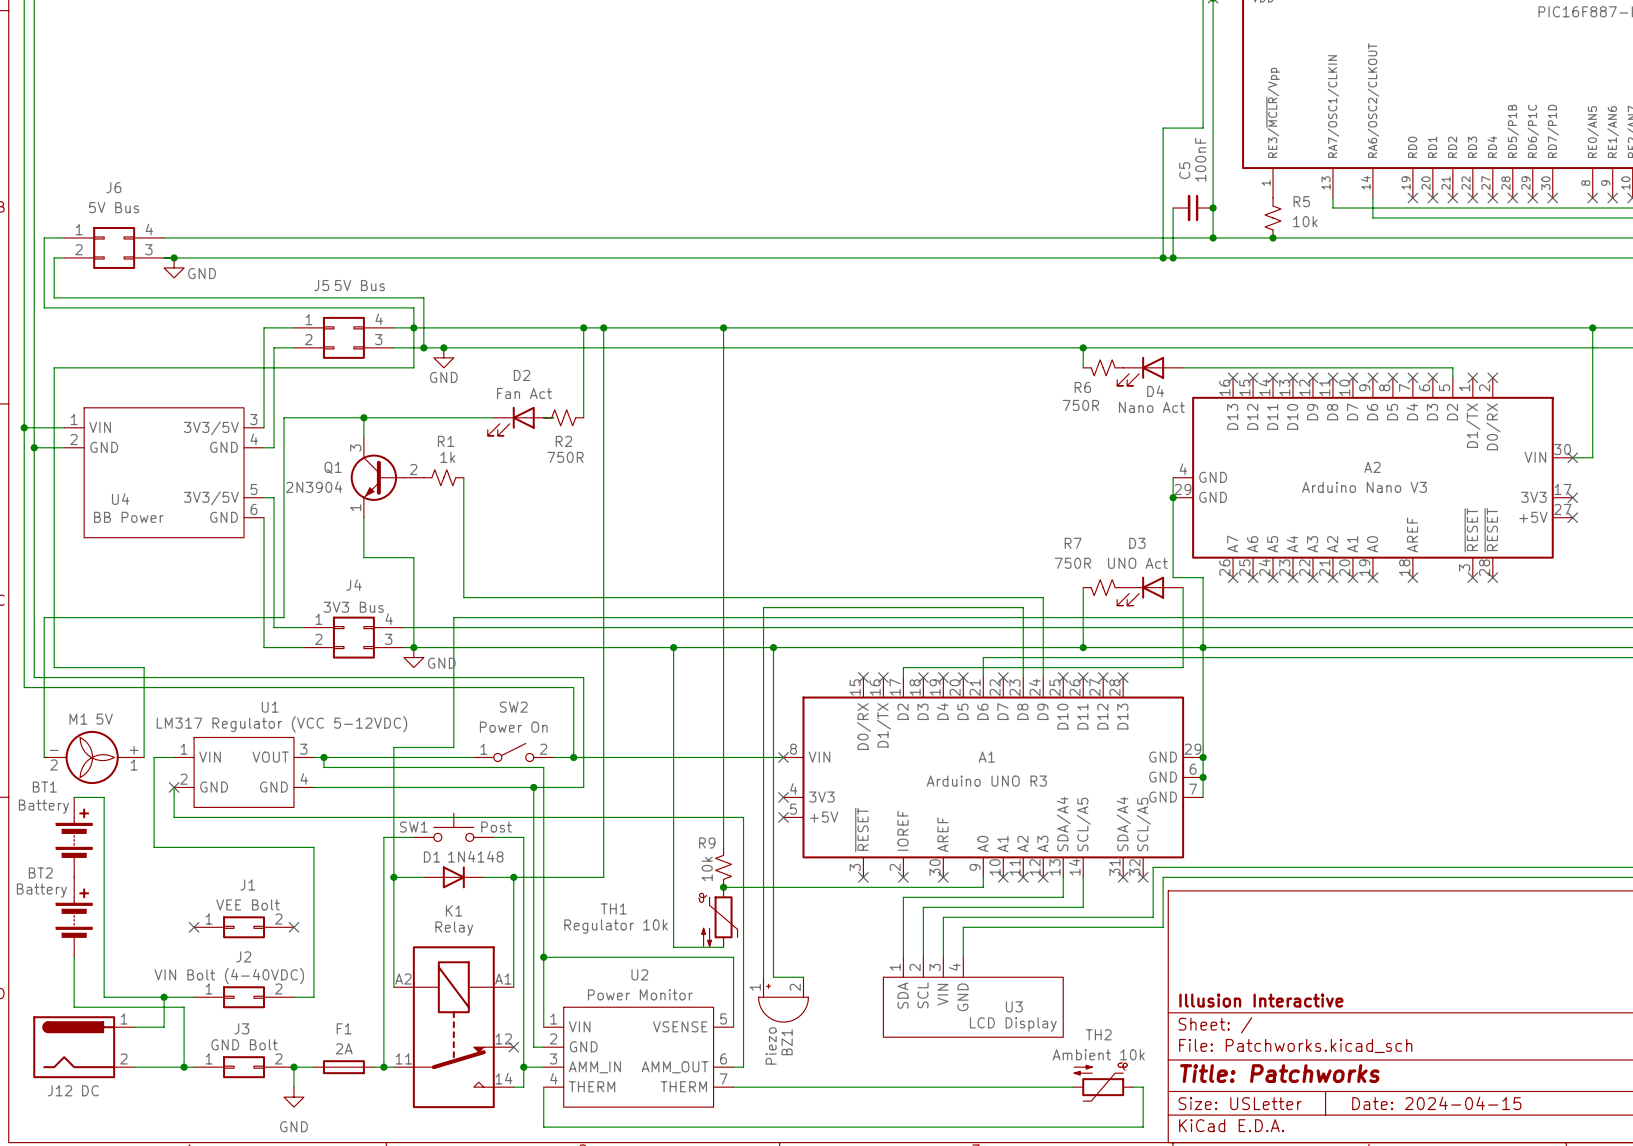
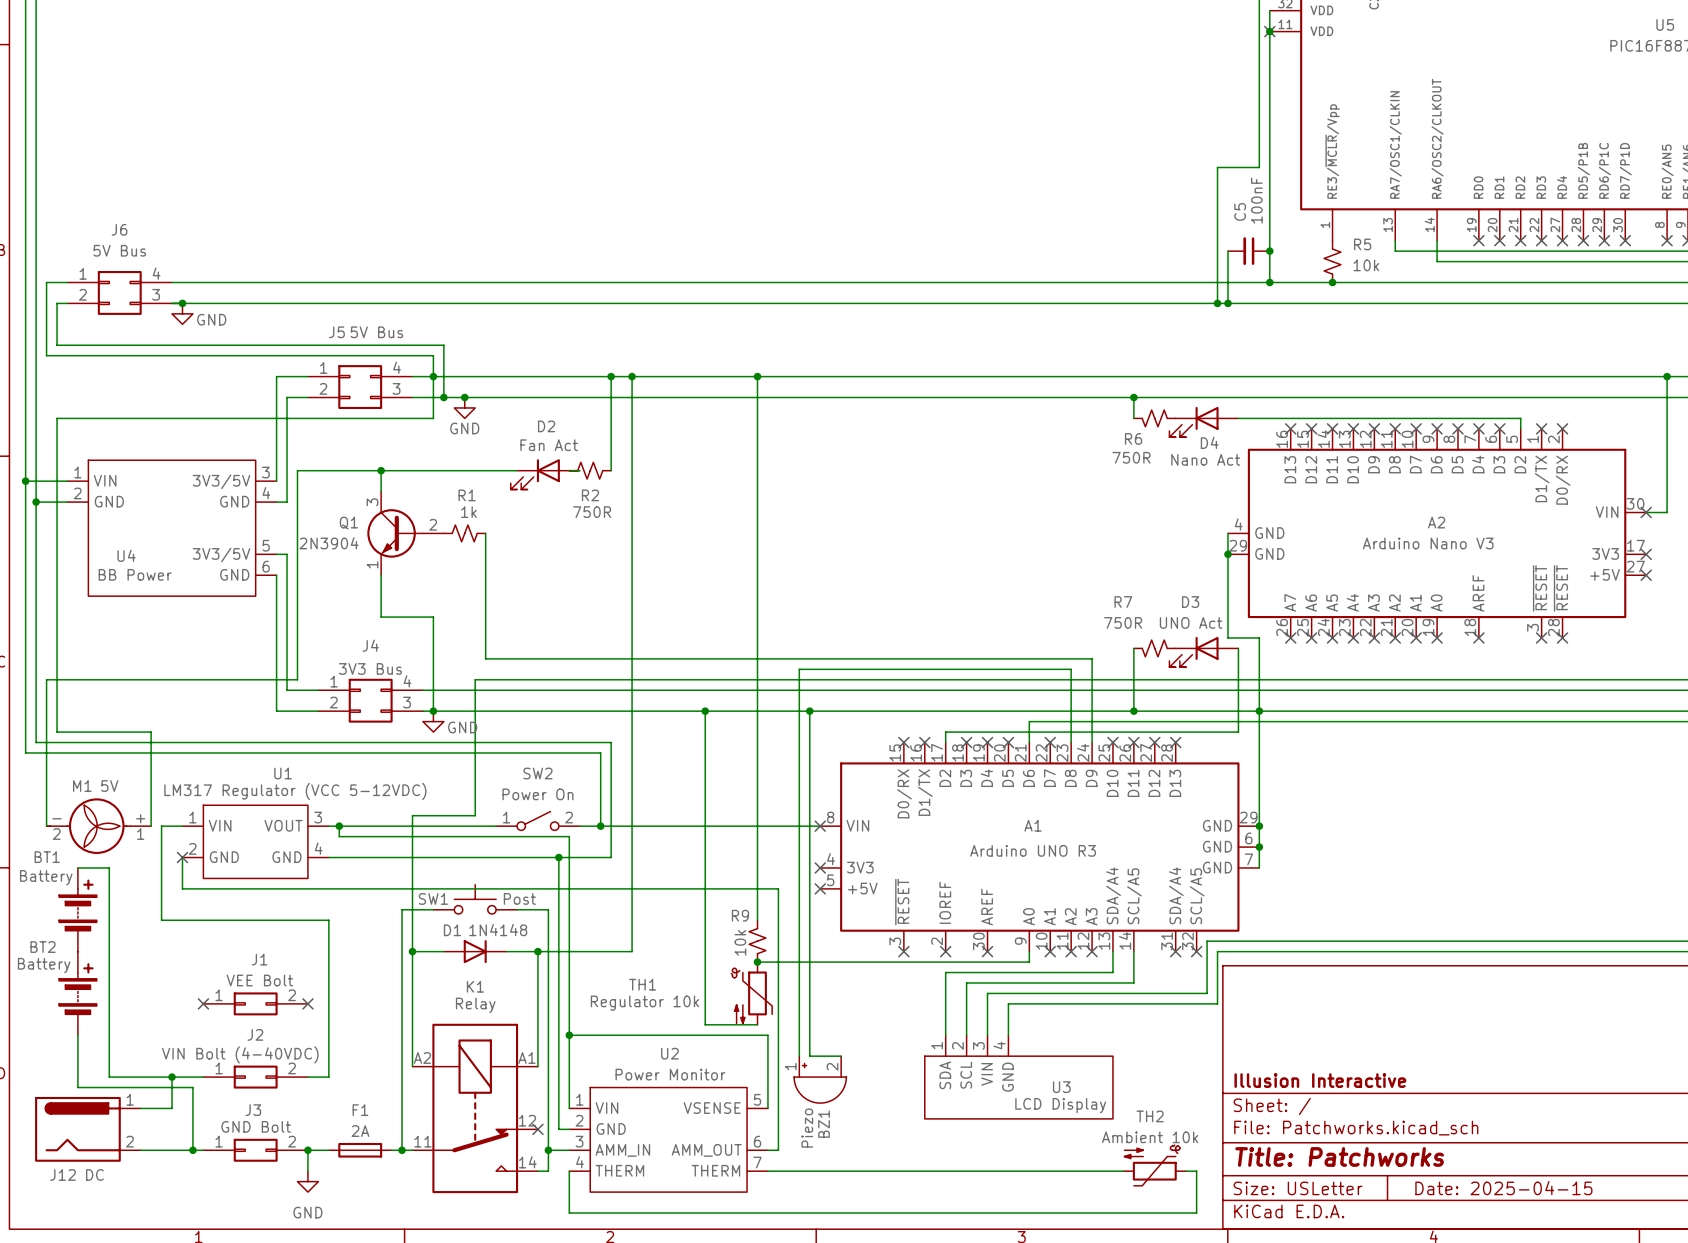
title block: Date: 2024-04-15 (1436, 1103) -> Date: 2025-04-15 (1503, 1188)

